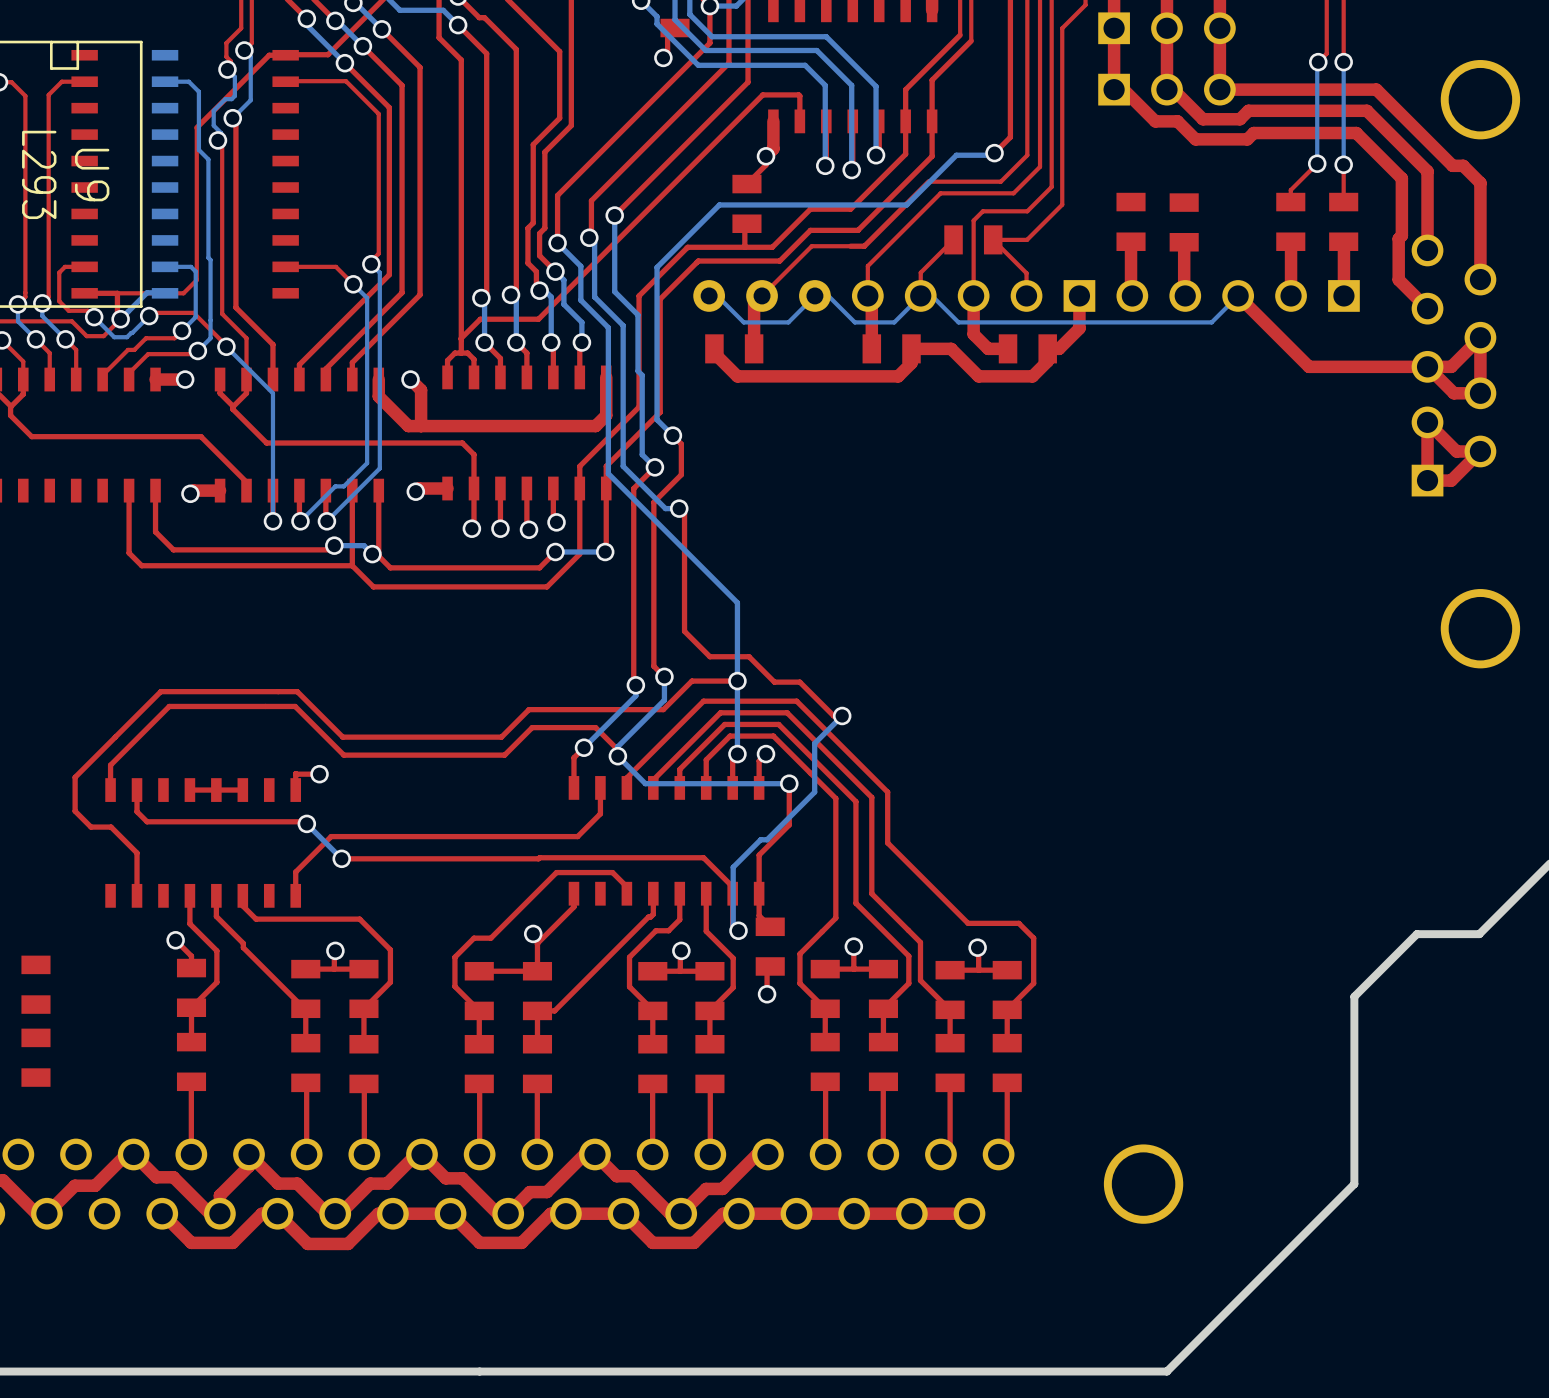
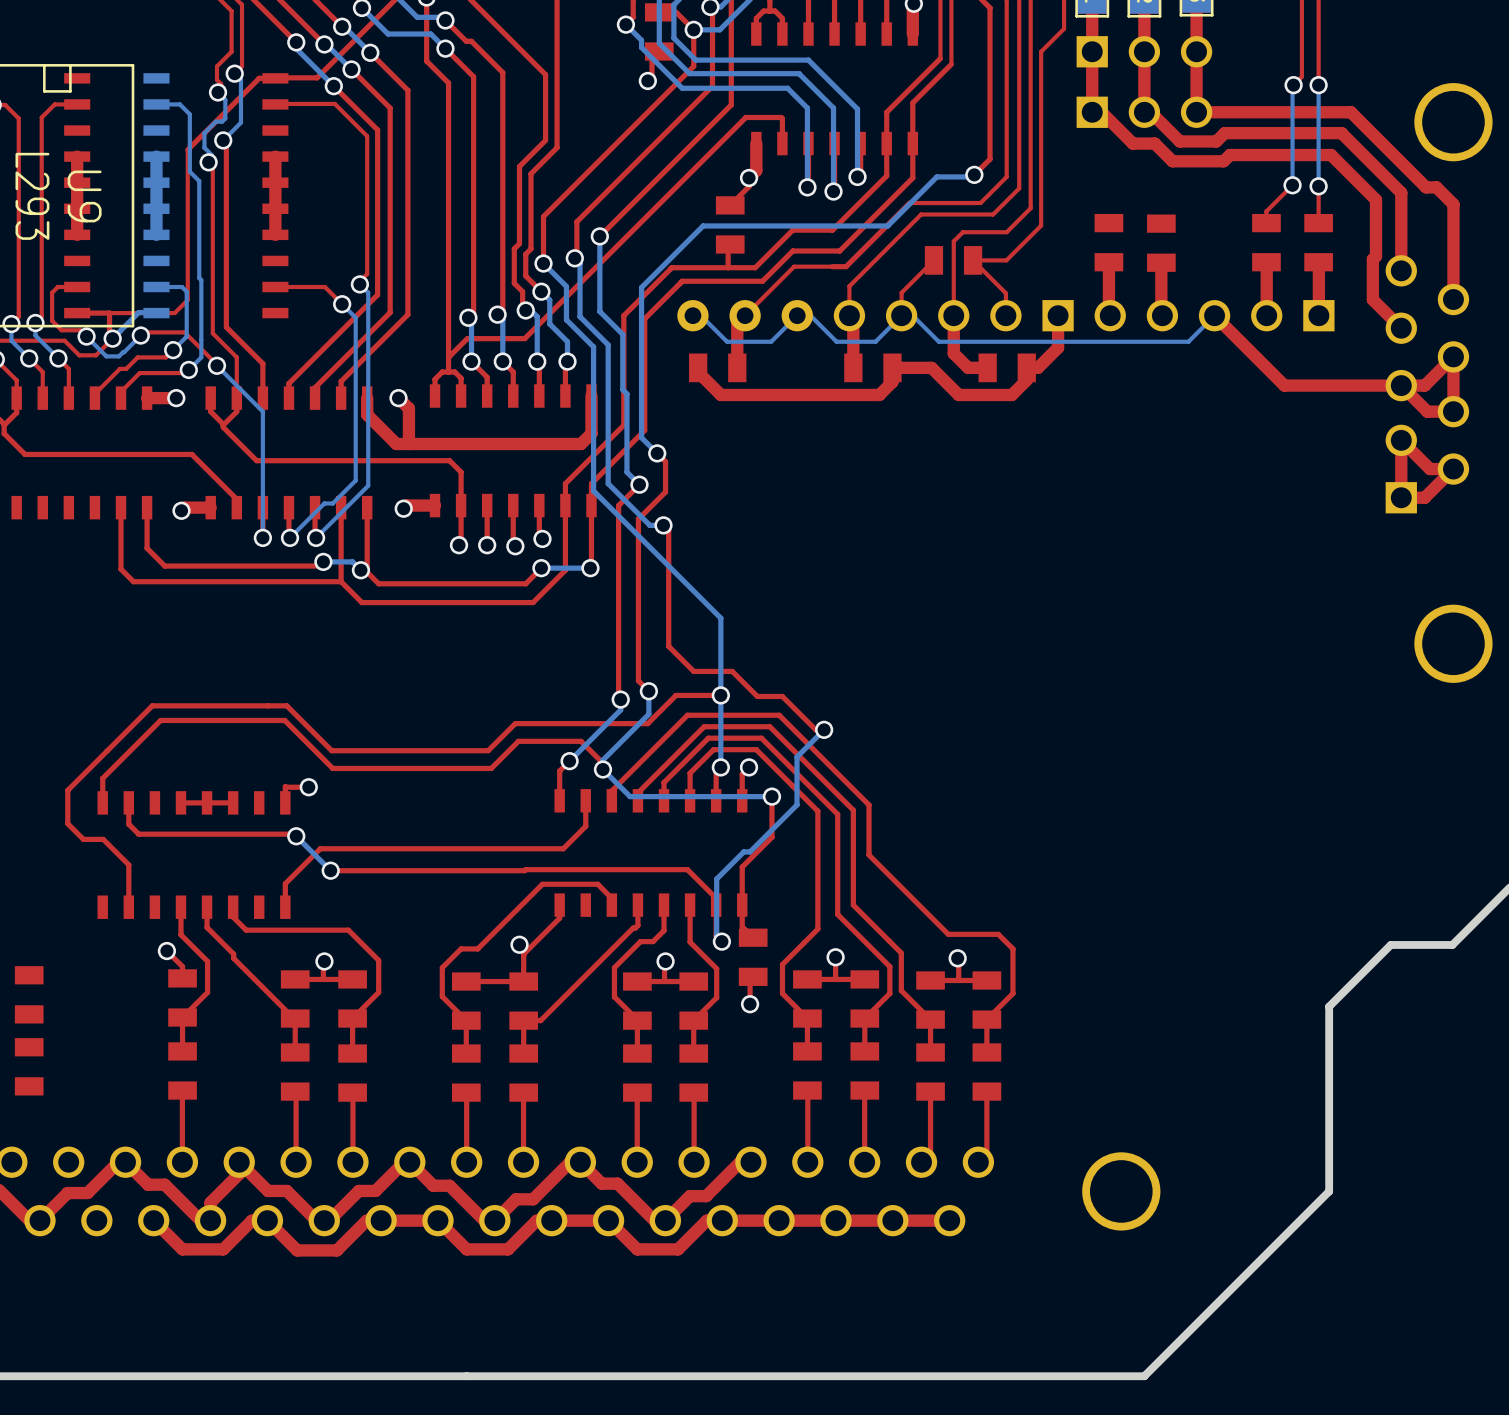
top track: none -> (77, 156) (77, 234)
bottom track: none -> (156, 156) (156, 234)
top track: none -> (275, 156) (275, 234)

